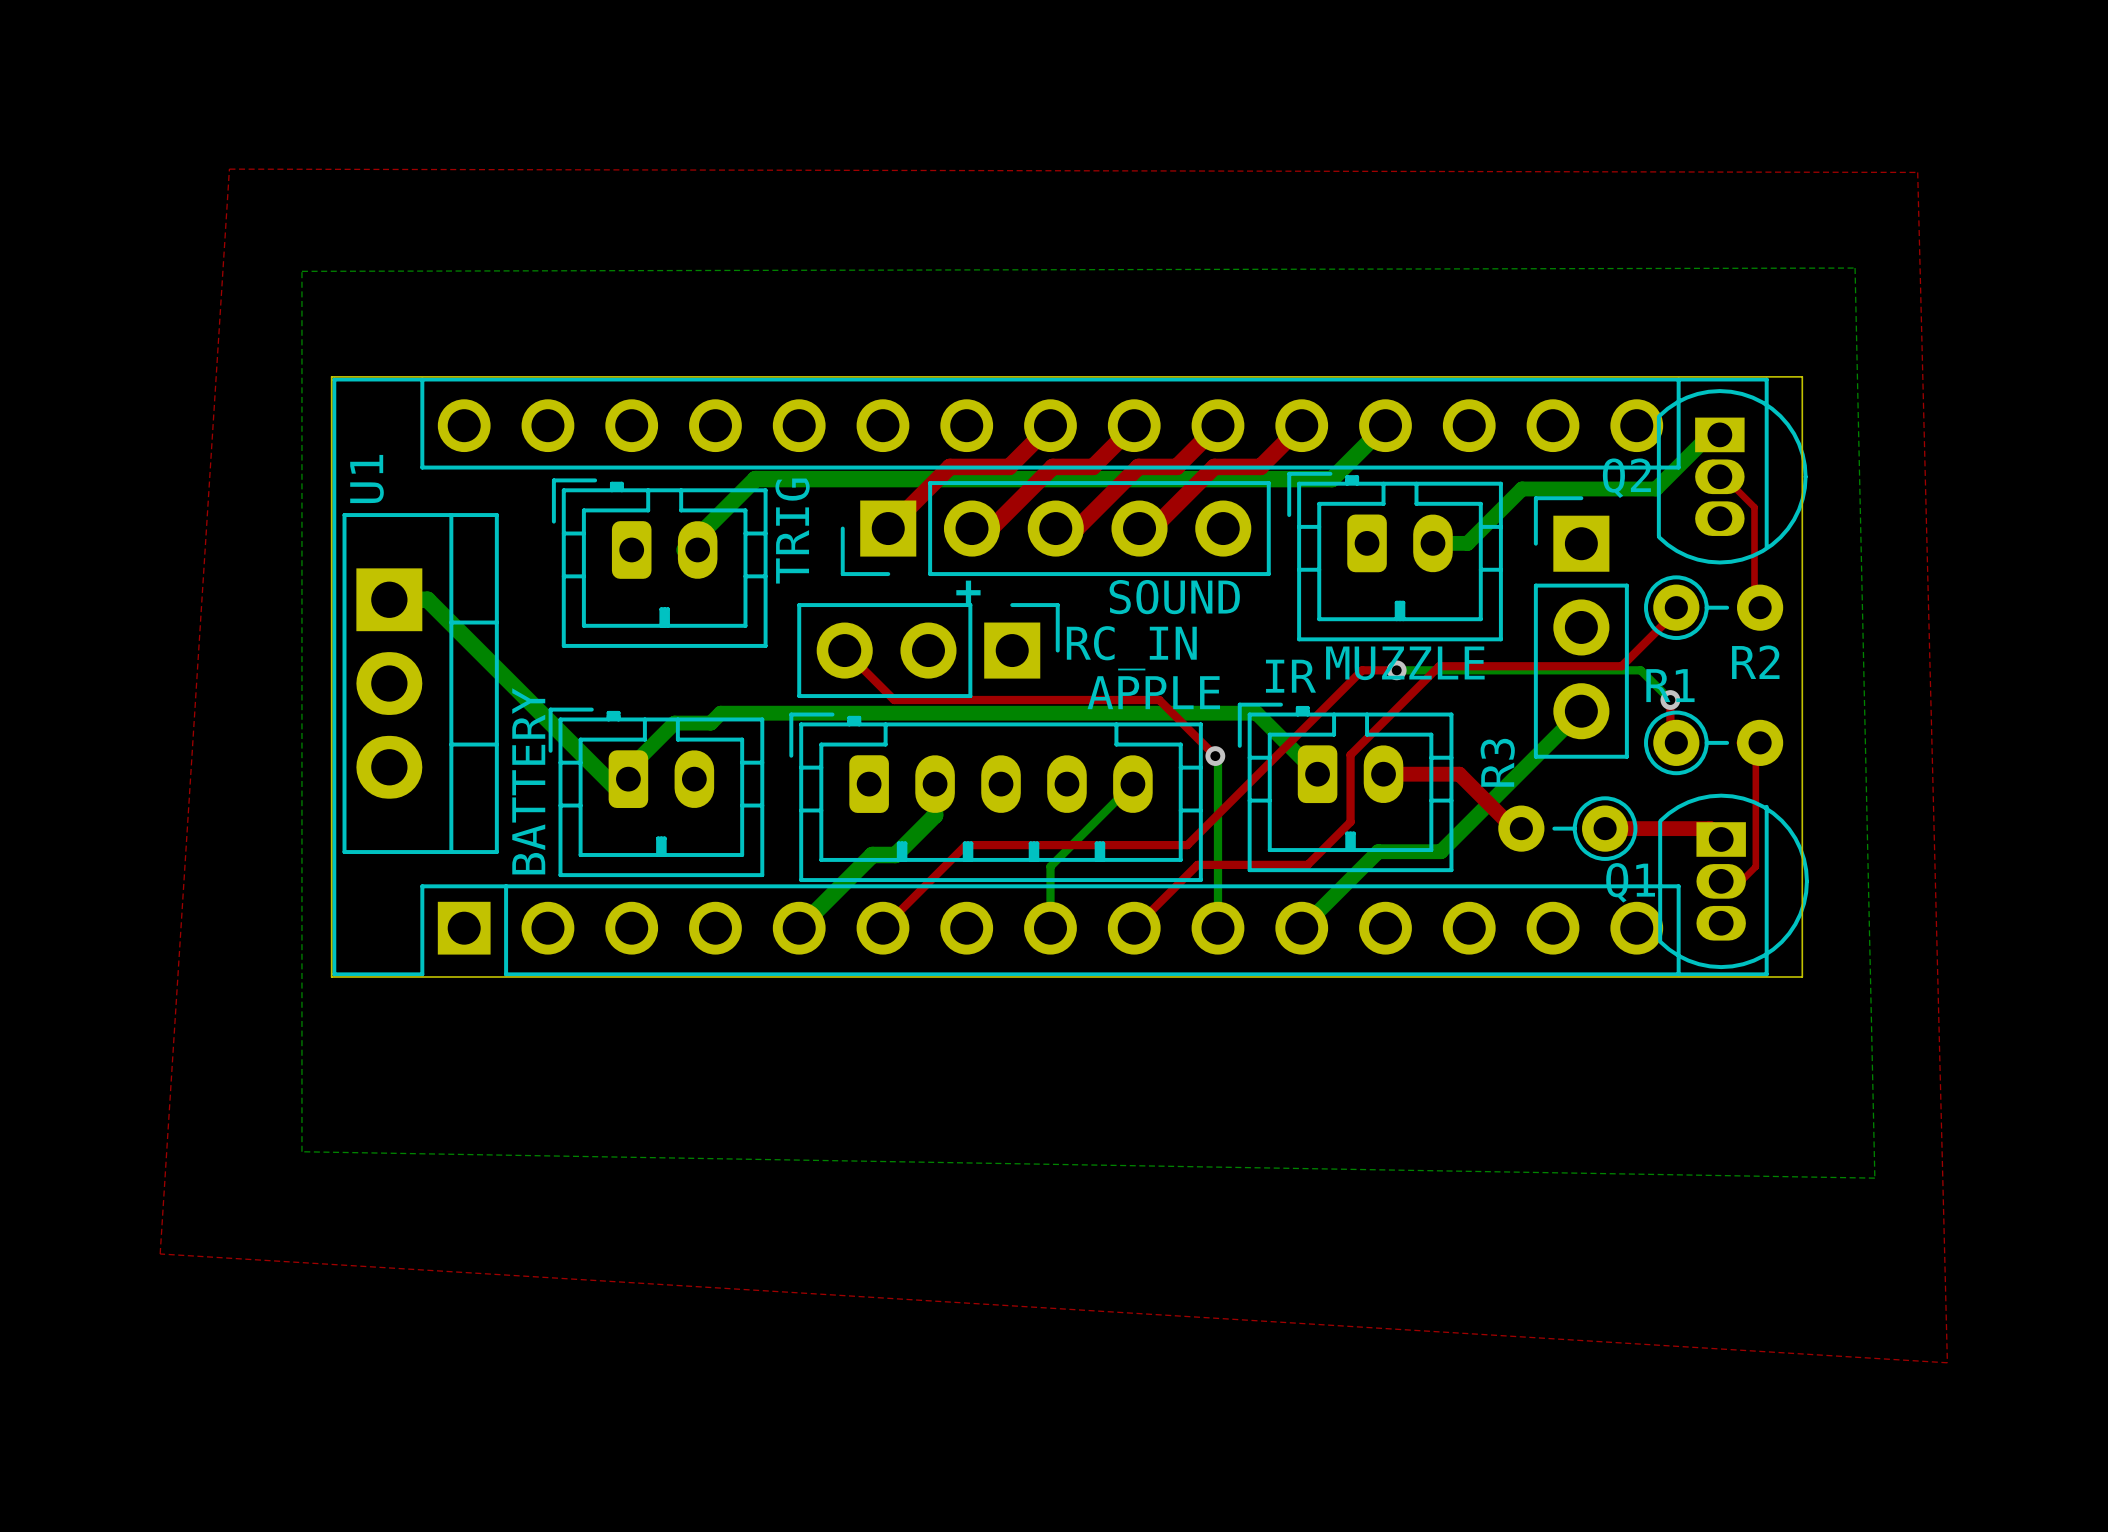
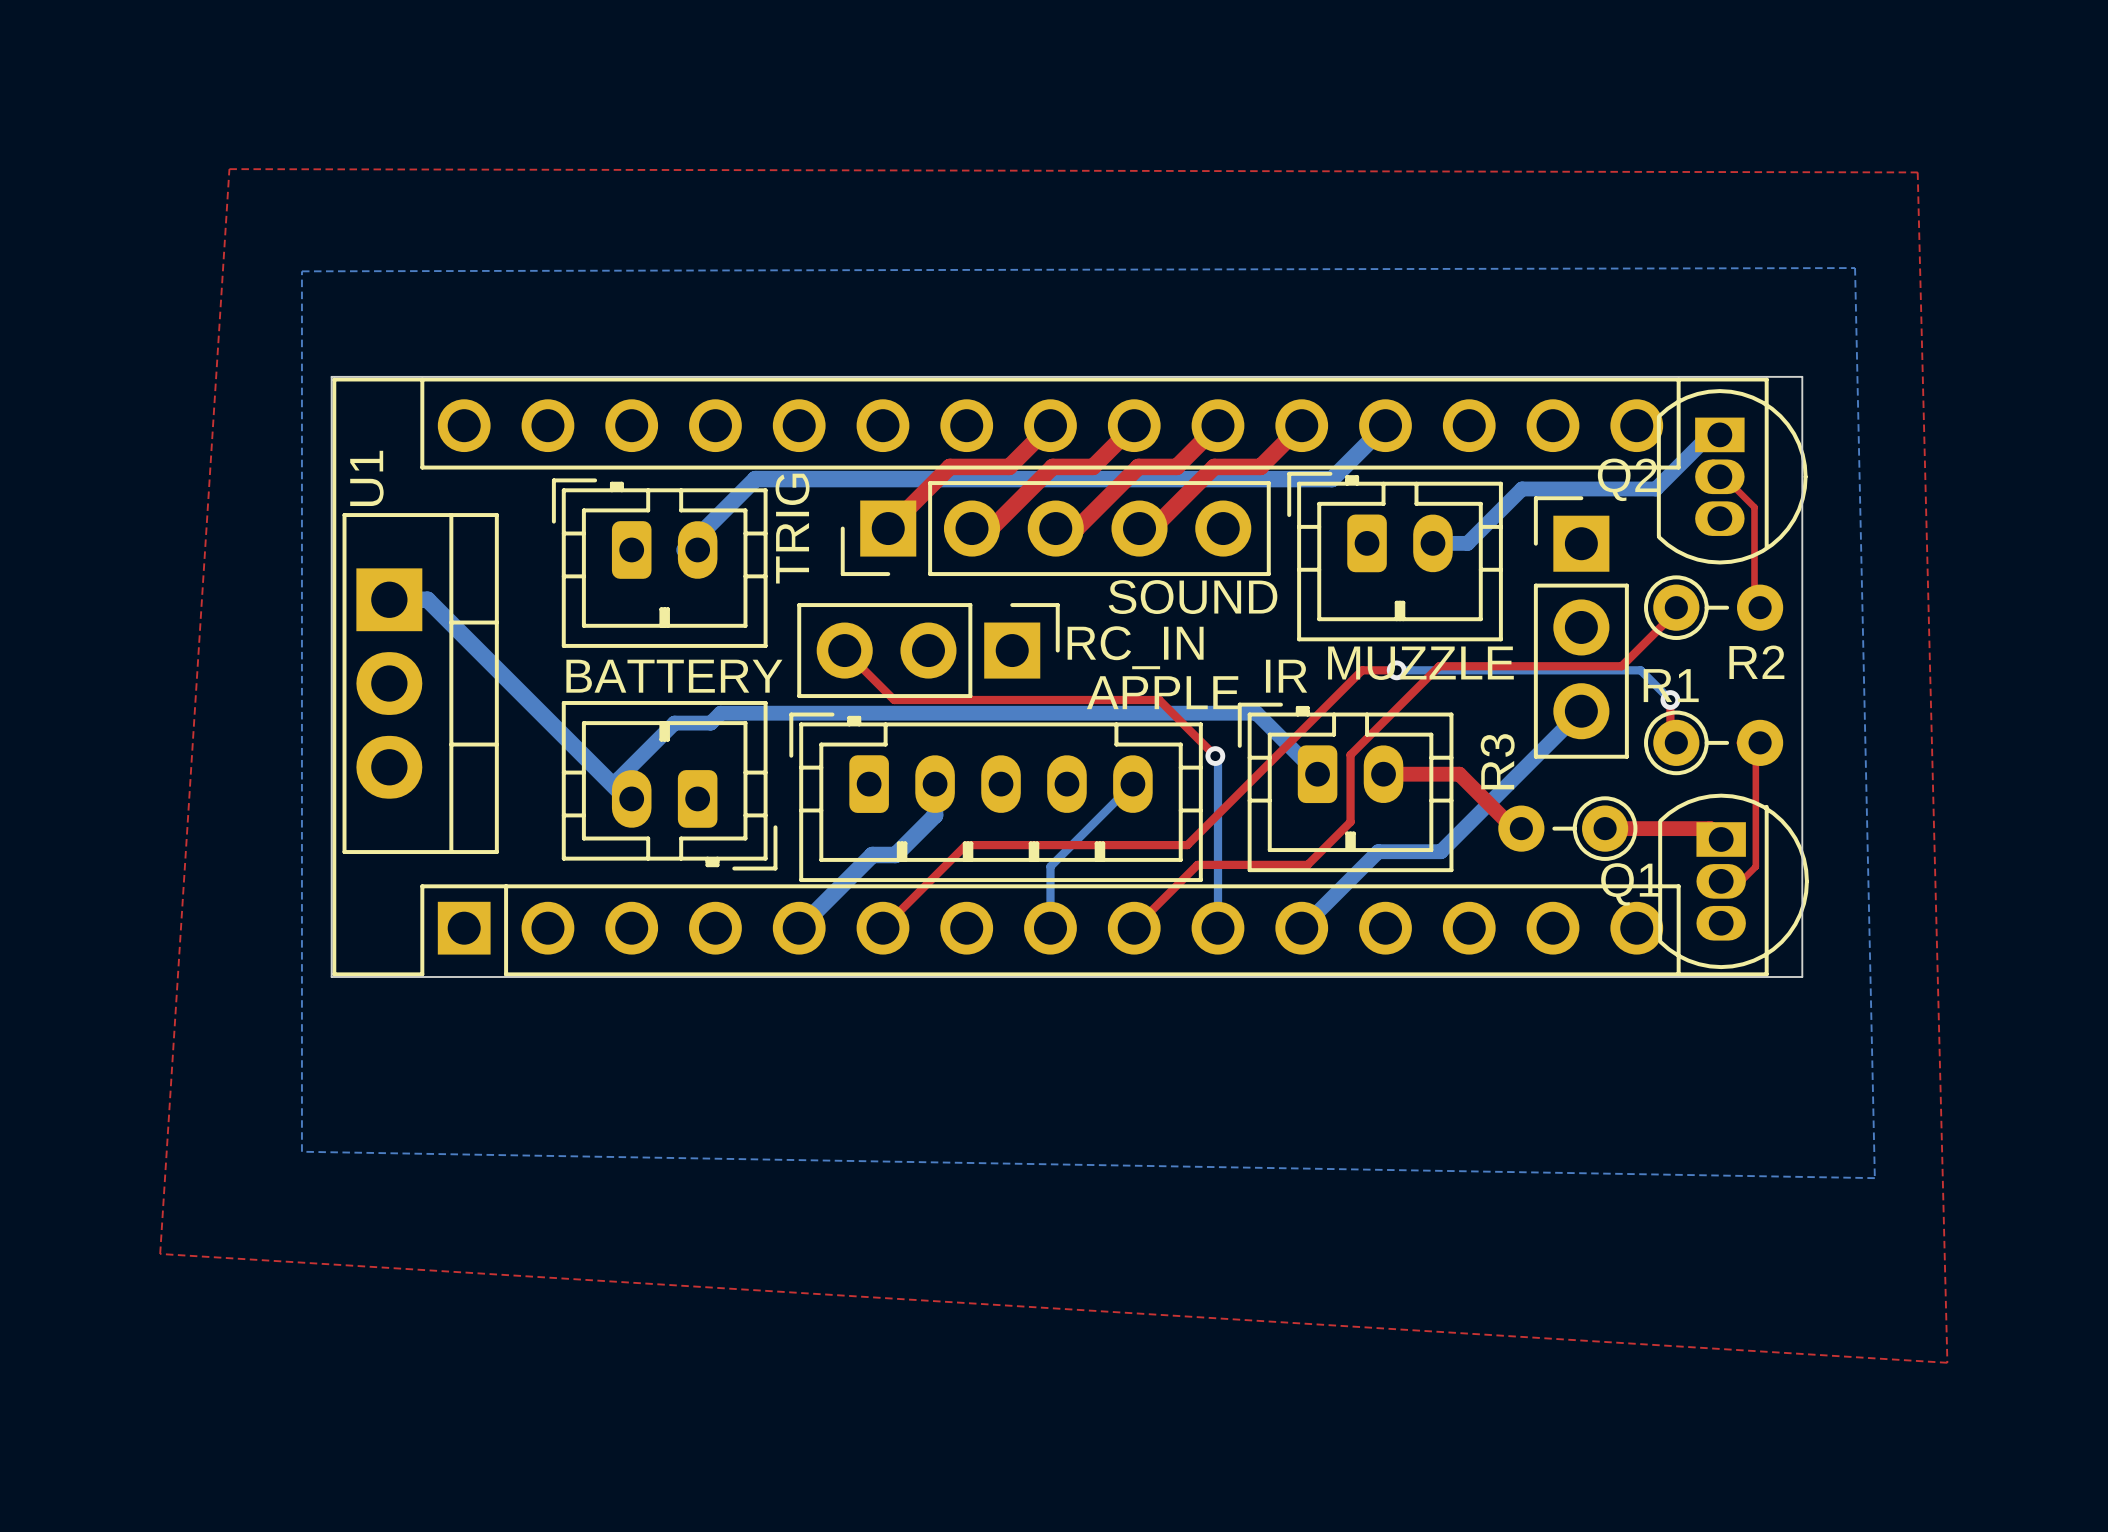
text: + (968, 592) -> none
text rotation: 0° (528, 781) -> 90° clockwise (674, 676)
part rotation: 0° (656, 792) -> 180° (669, 785)

